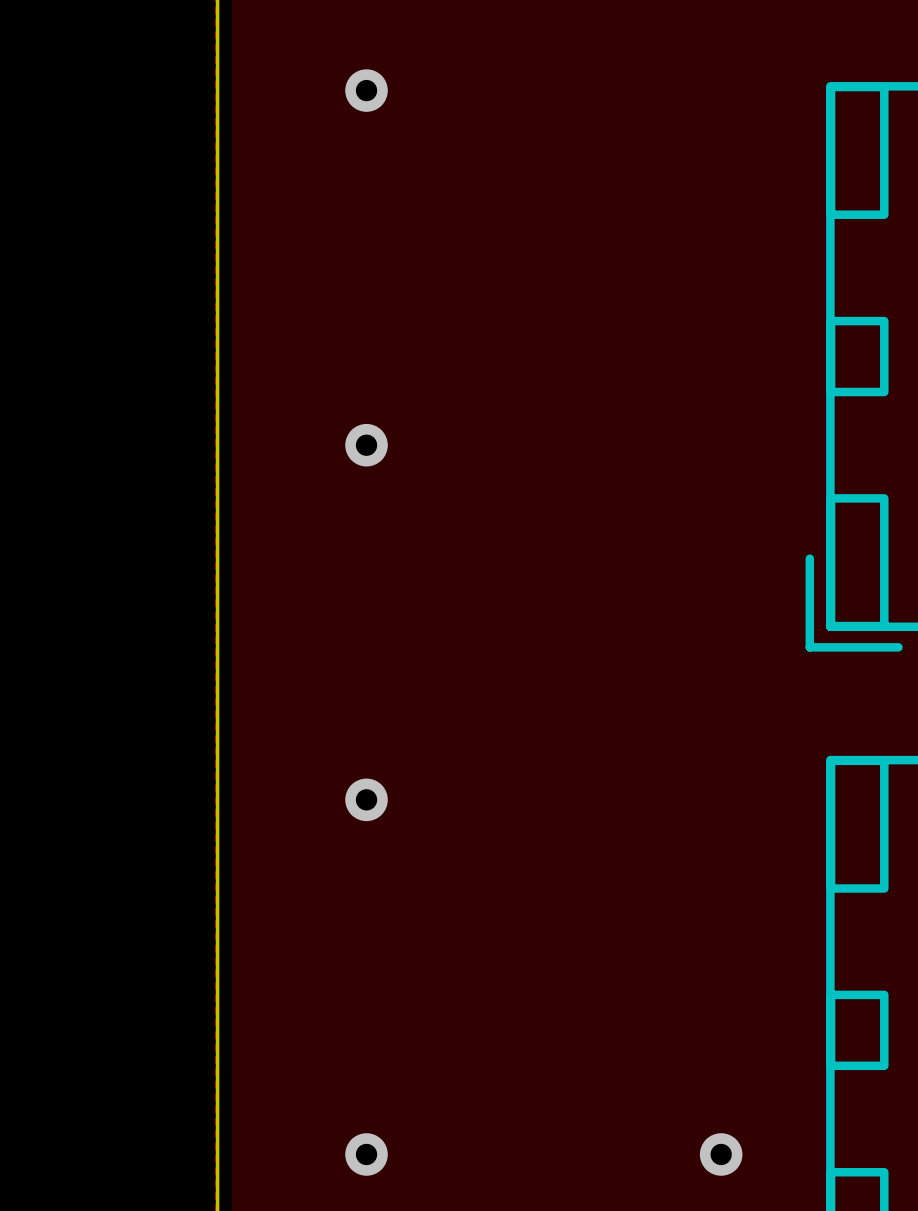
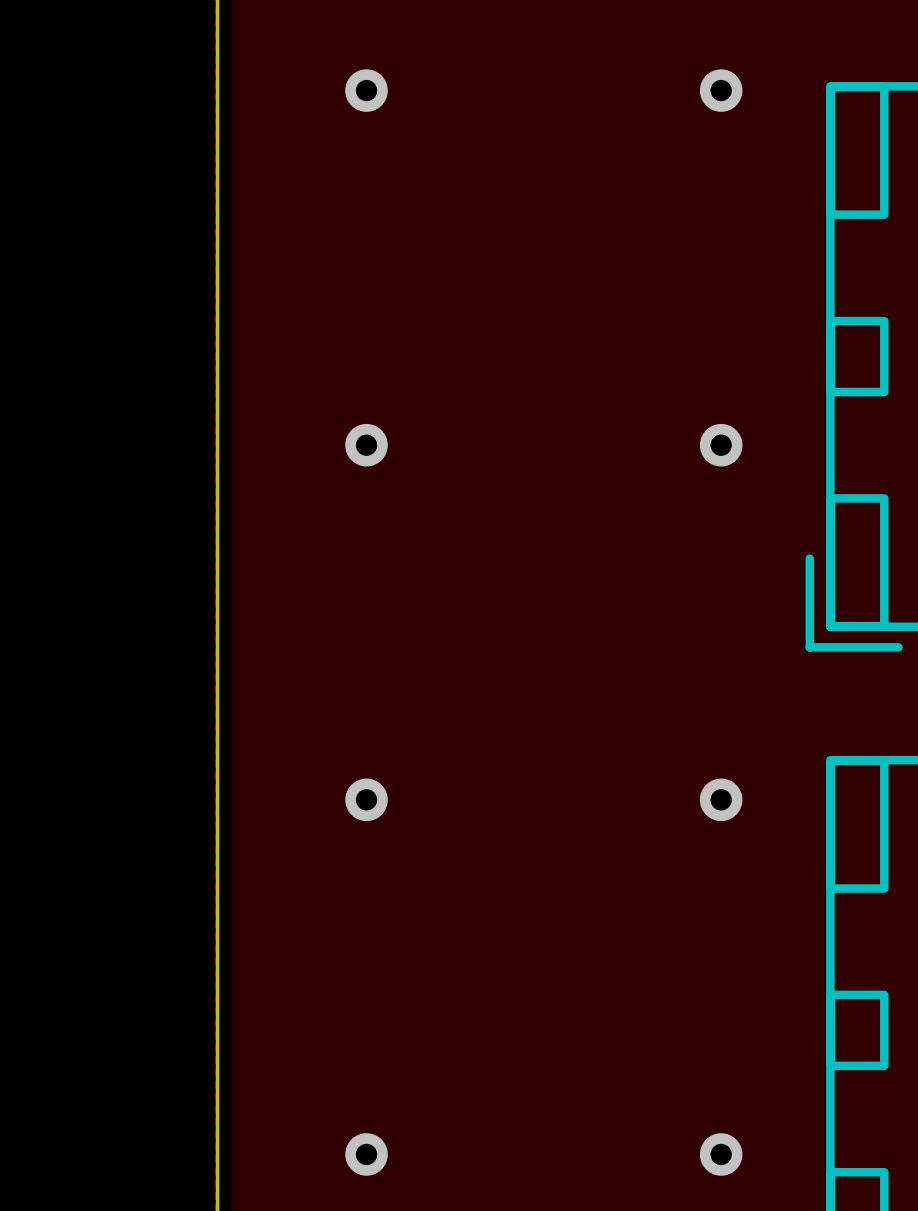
via: none -> (721, 90)
via: none -> (721, 445)
via: none -> (721, 799)

